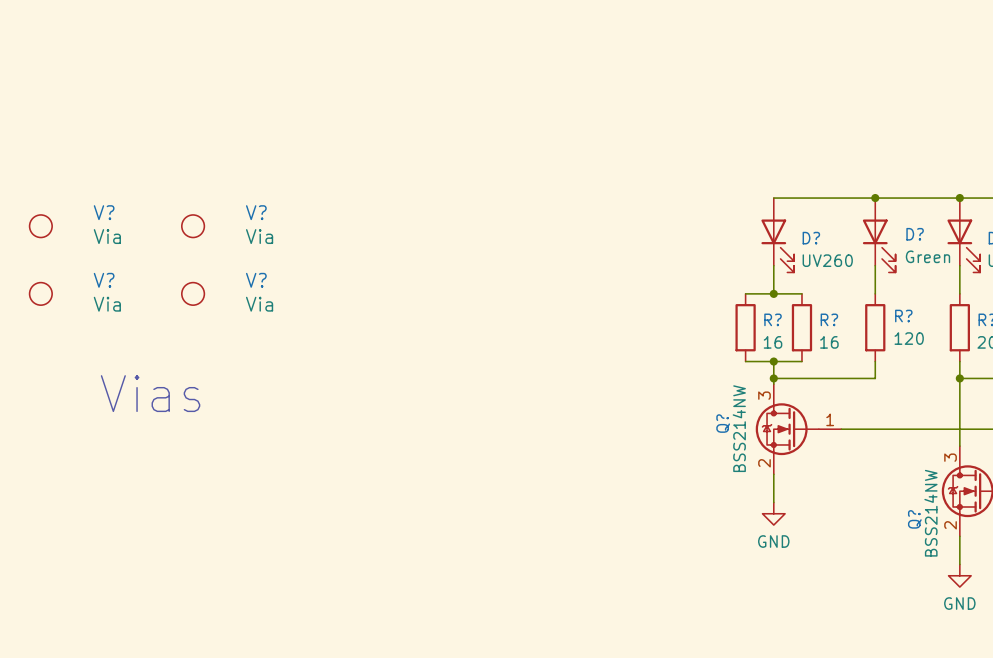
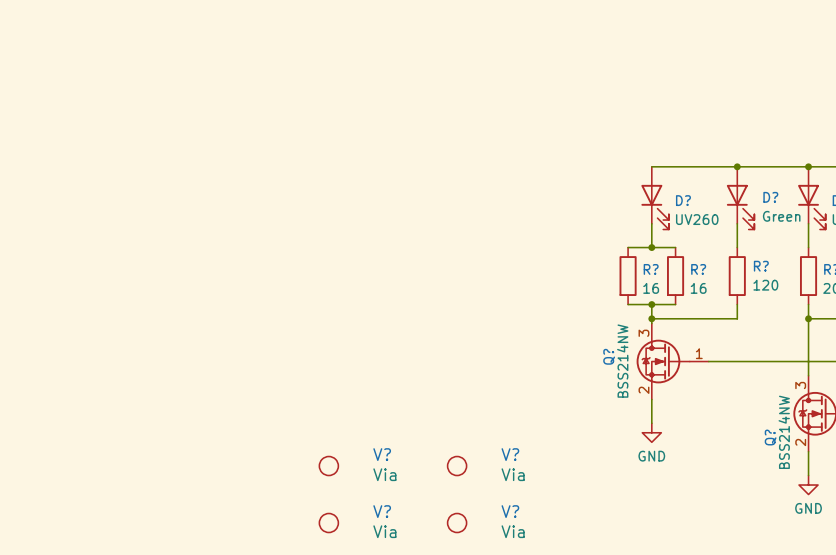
V?: Via (40, 226) -> none
V?: Via (193, 226) -> none
V?: Via (40, 293) -> none
V?: Via (193, 293) -> none
text: Vias (150, 393) -> none
V?: none -> Via (328, 466)
V?: none -> Via (457, 466)
V?: none -> Via (328, 523)
V?: none -> Via (457, 523)

